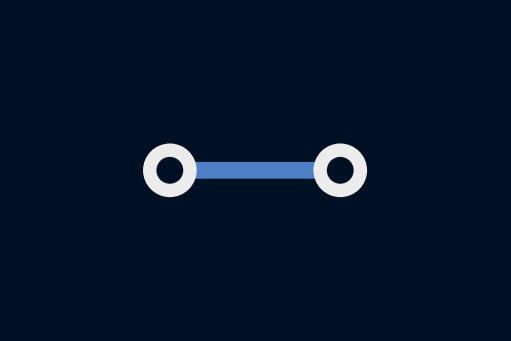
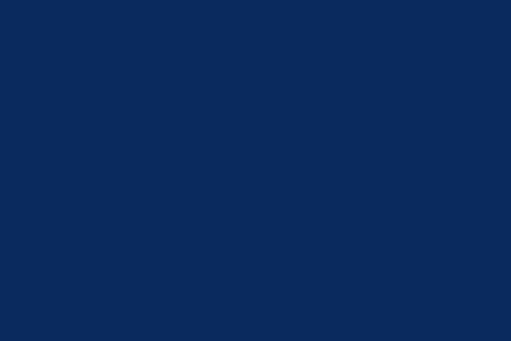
via: (169, 170) -> none
track: (340, 170) (169, 170) -> none
via: (340, 170) -> none

